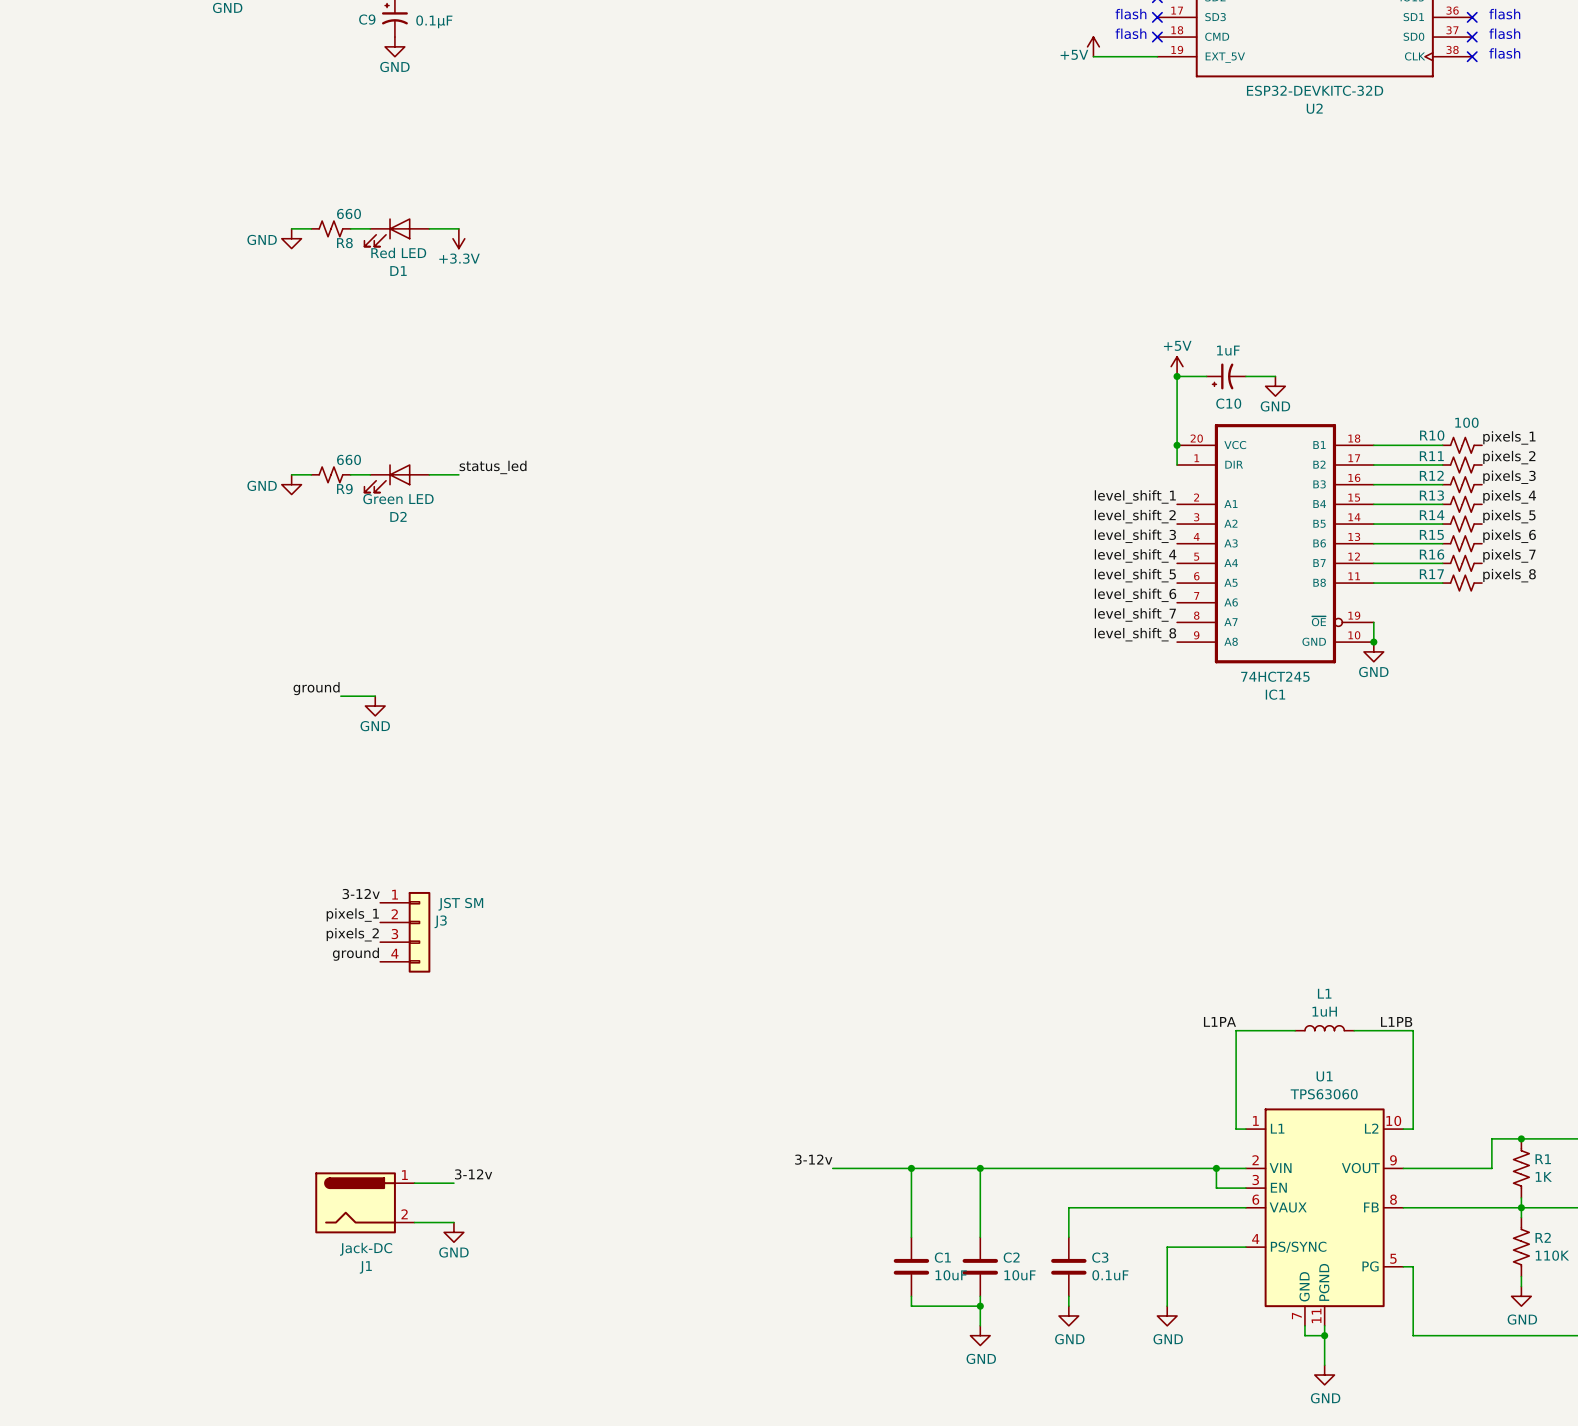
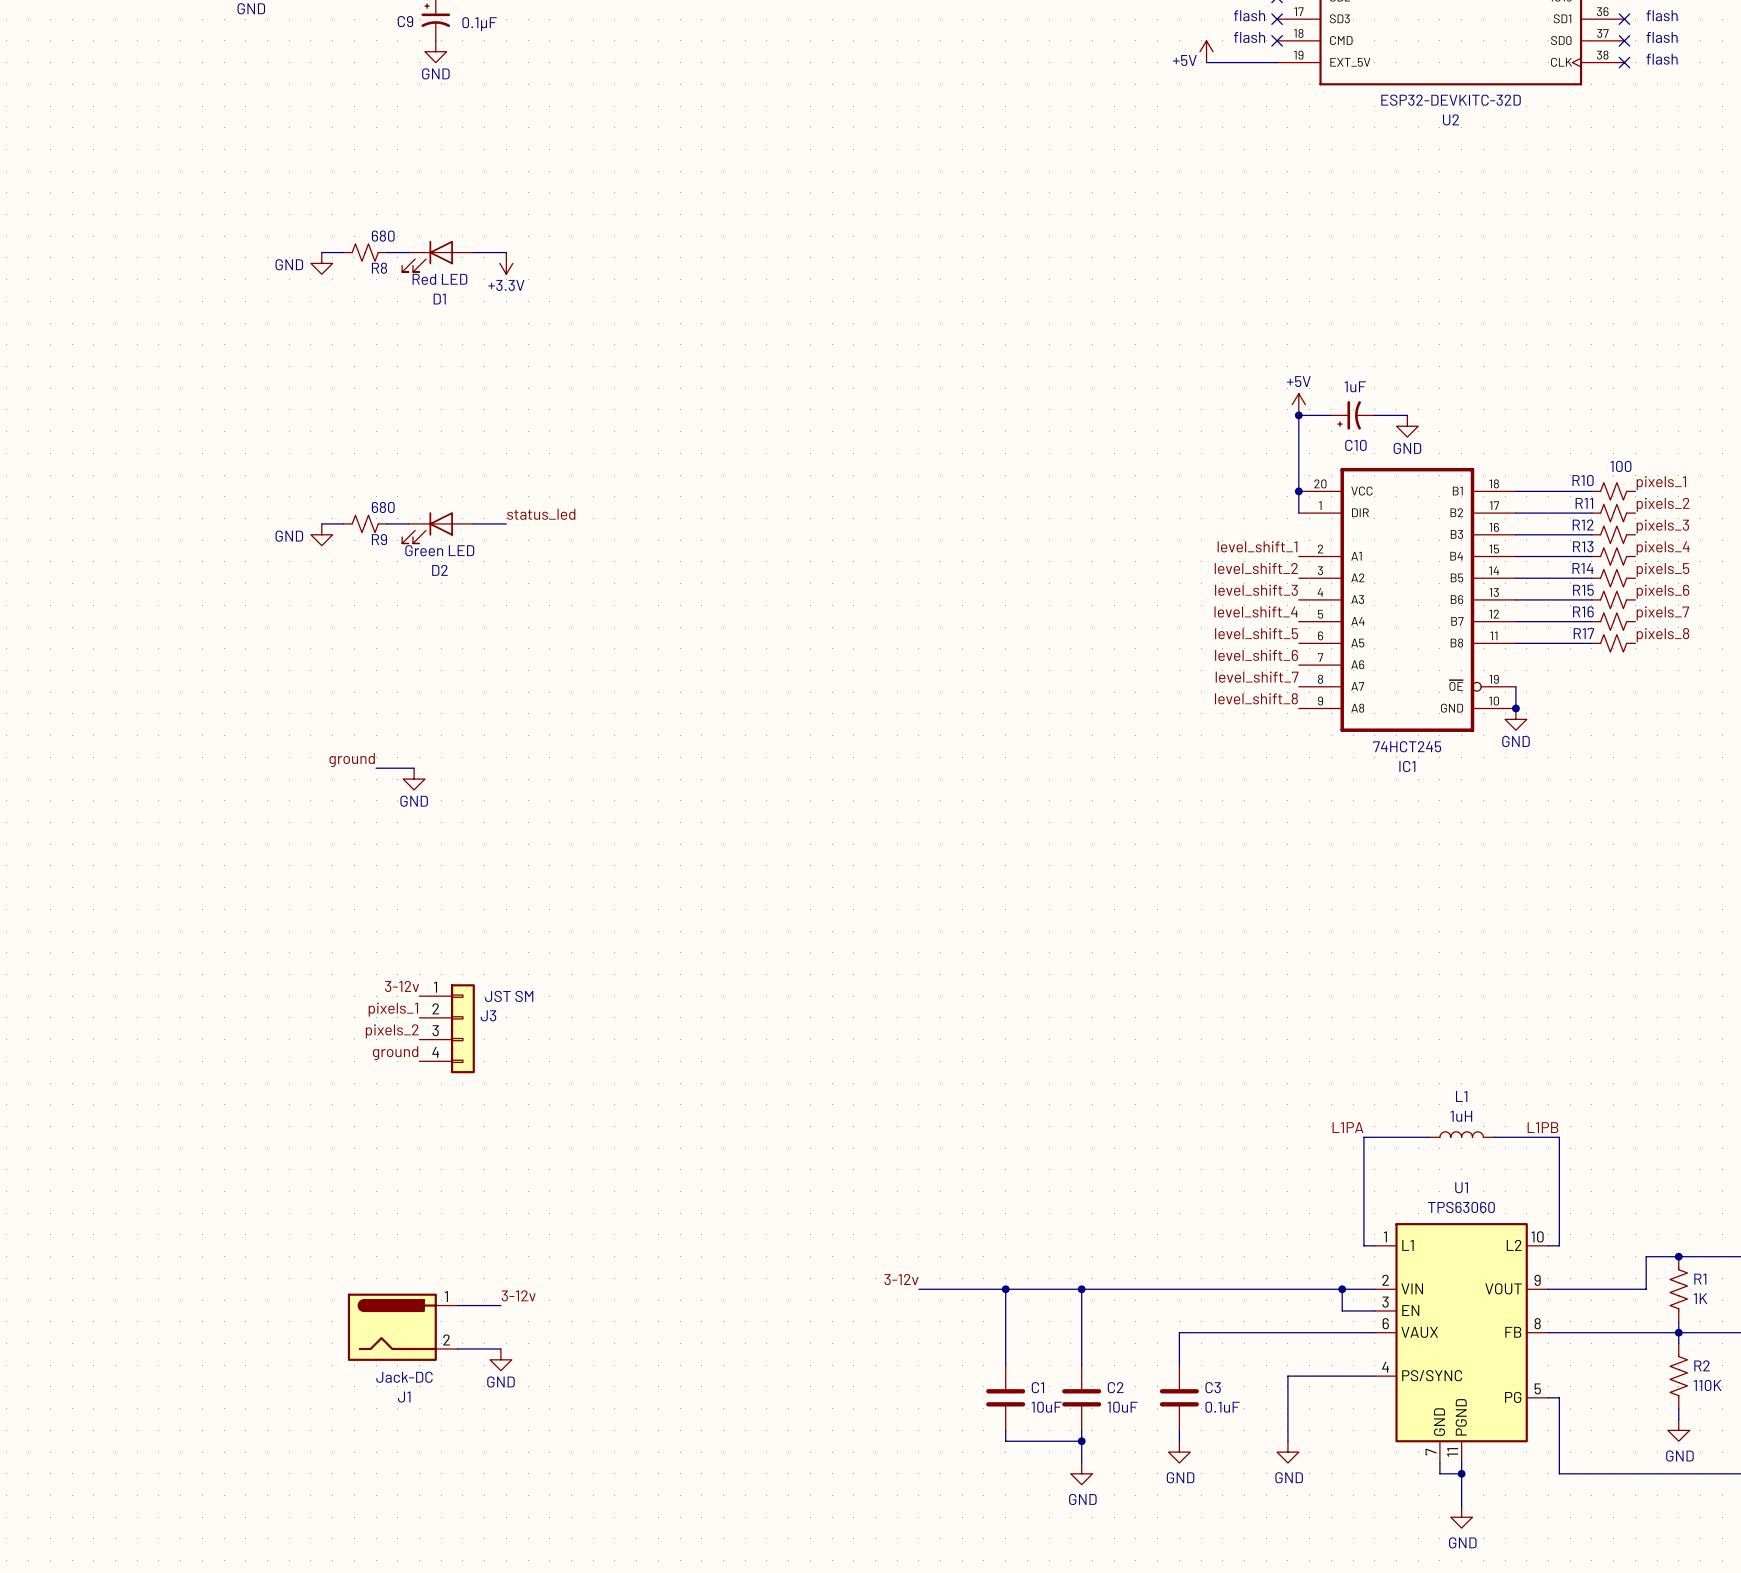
R8 value: 660 (349, 213) -> 680 (383, 236)
R9 value: 660 (349, 459) -> 680 (383, 507)

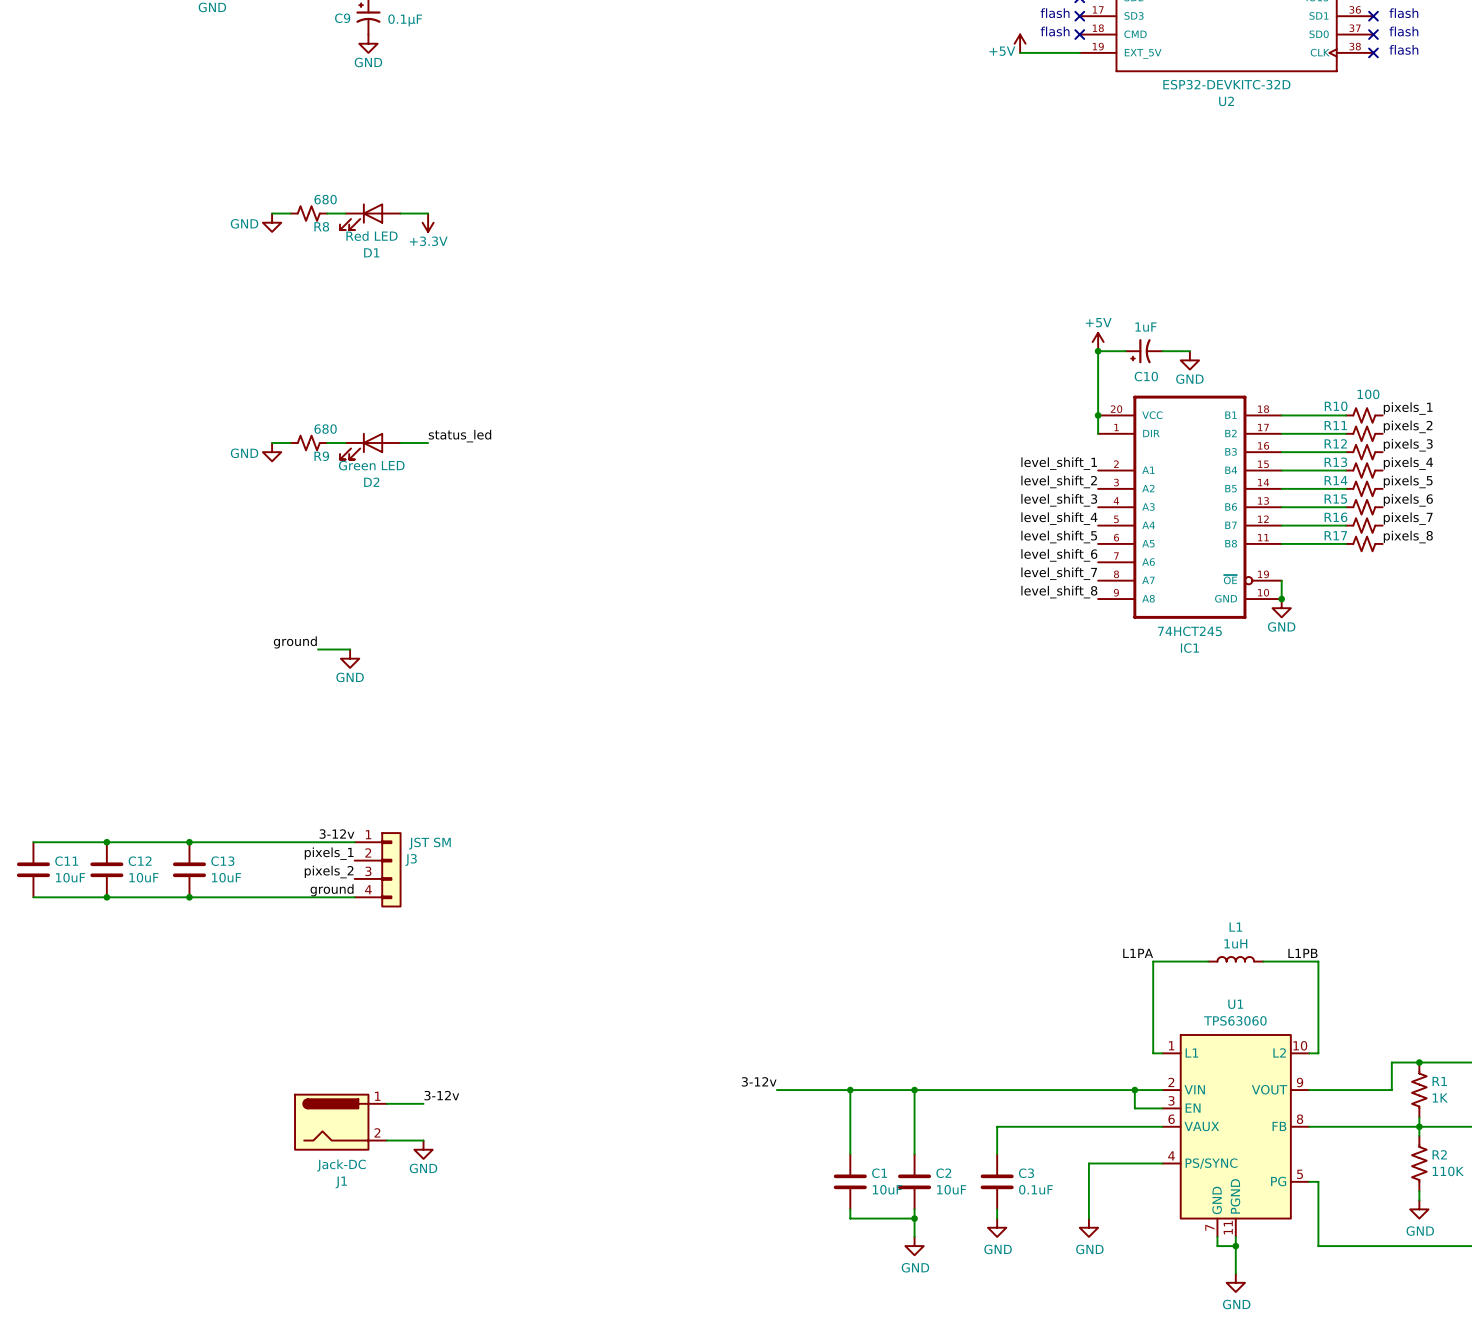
wire: none -> (33, 842) (354, 842)
junction: none -> (106, 842)
junction: none -> (189, 842)
C11: none -> 10uF (33, 869)
C12: none -> 10uF (106, 869)
C13: none -> 10uF (189, 869)
wire: none -> (33, 897) (354, 897)
junction: none -> (106, 897)
junction: none -> (189, 897)

